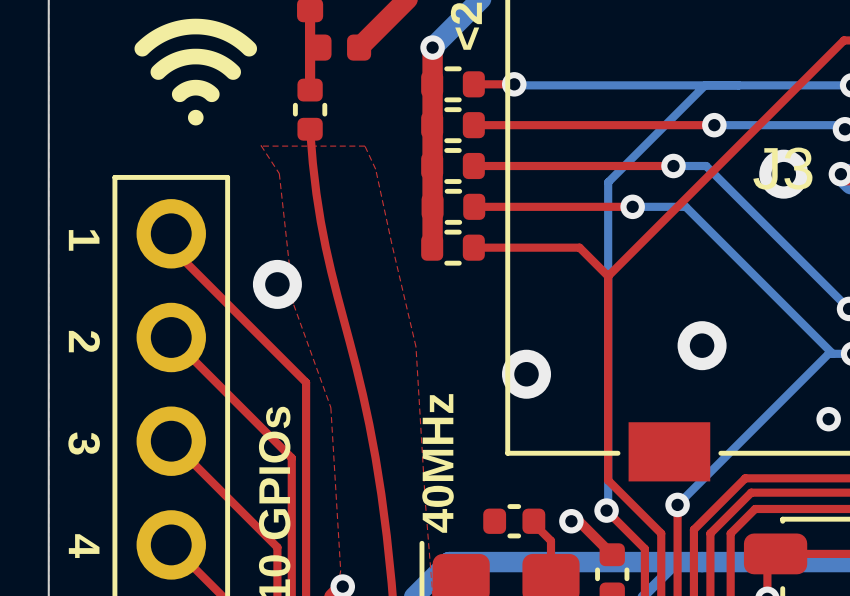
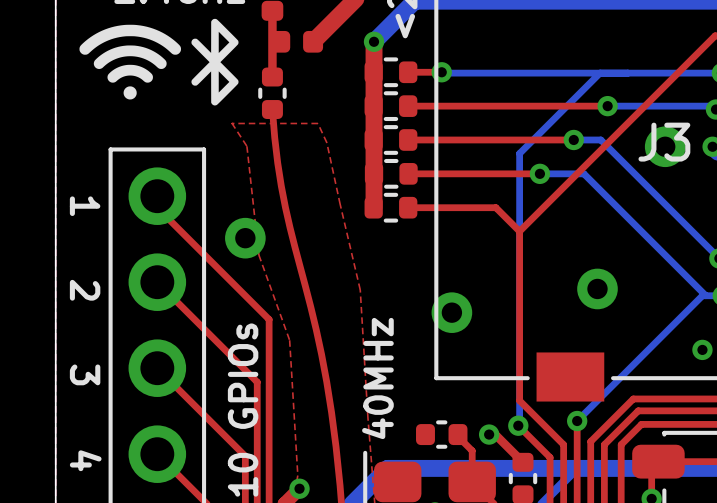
drawing: [134, 18, 257, 126] -> none
drawing: none -> [79, 18, 239, 106]

